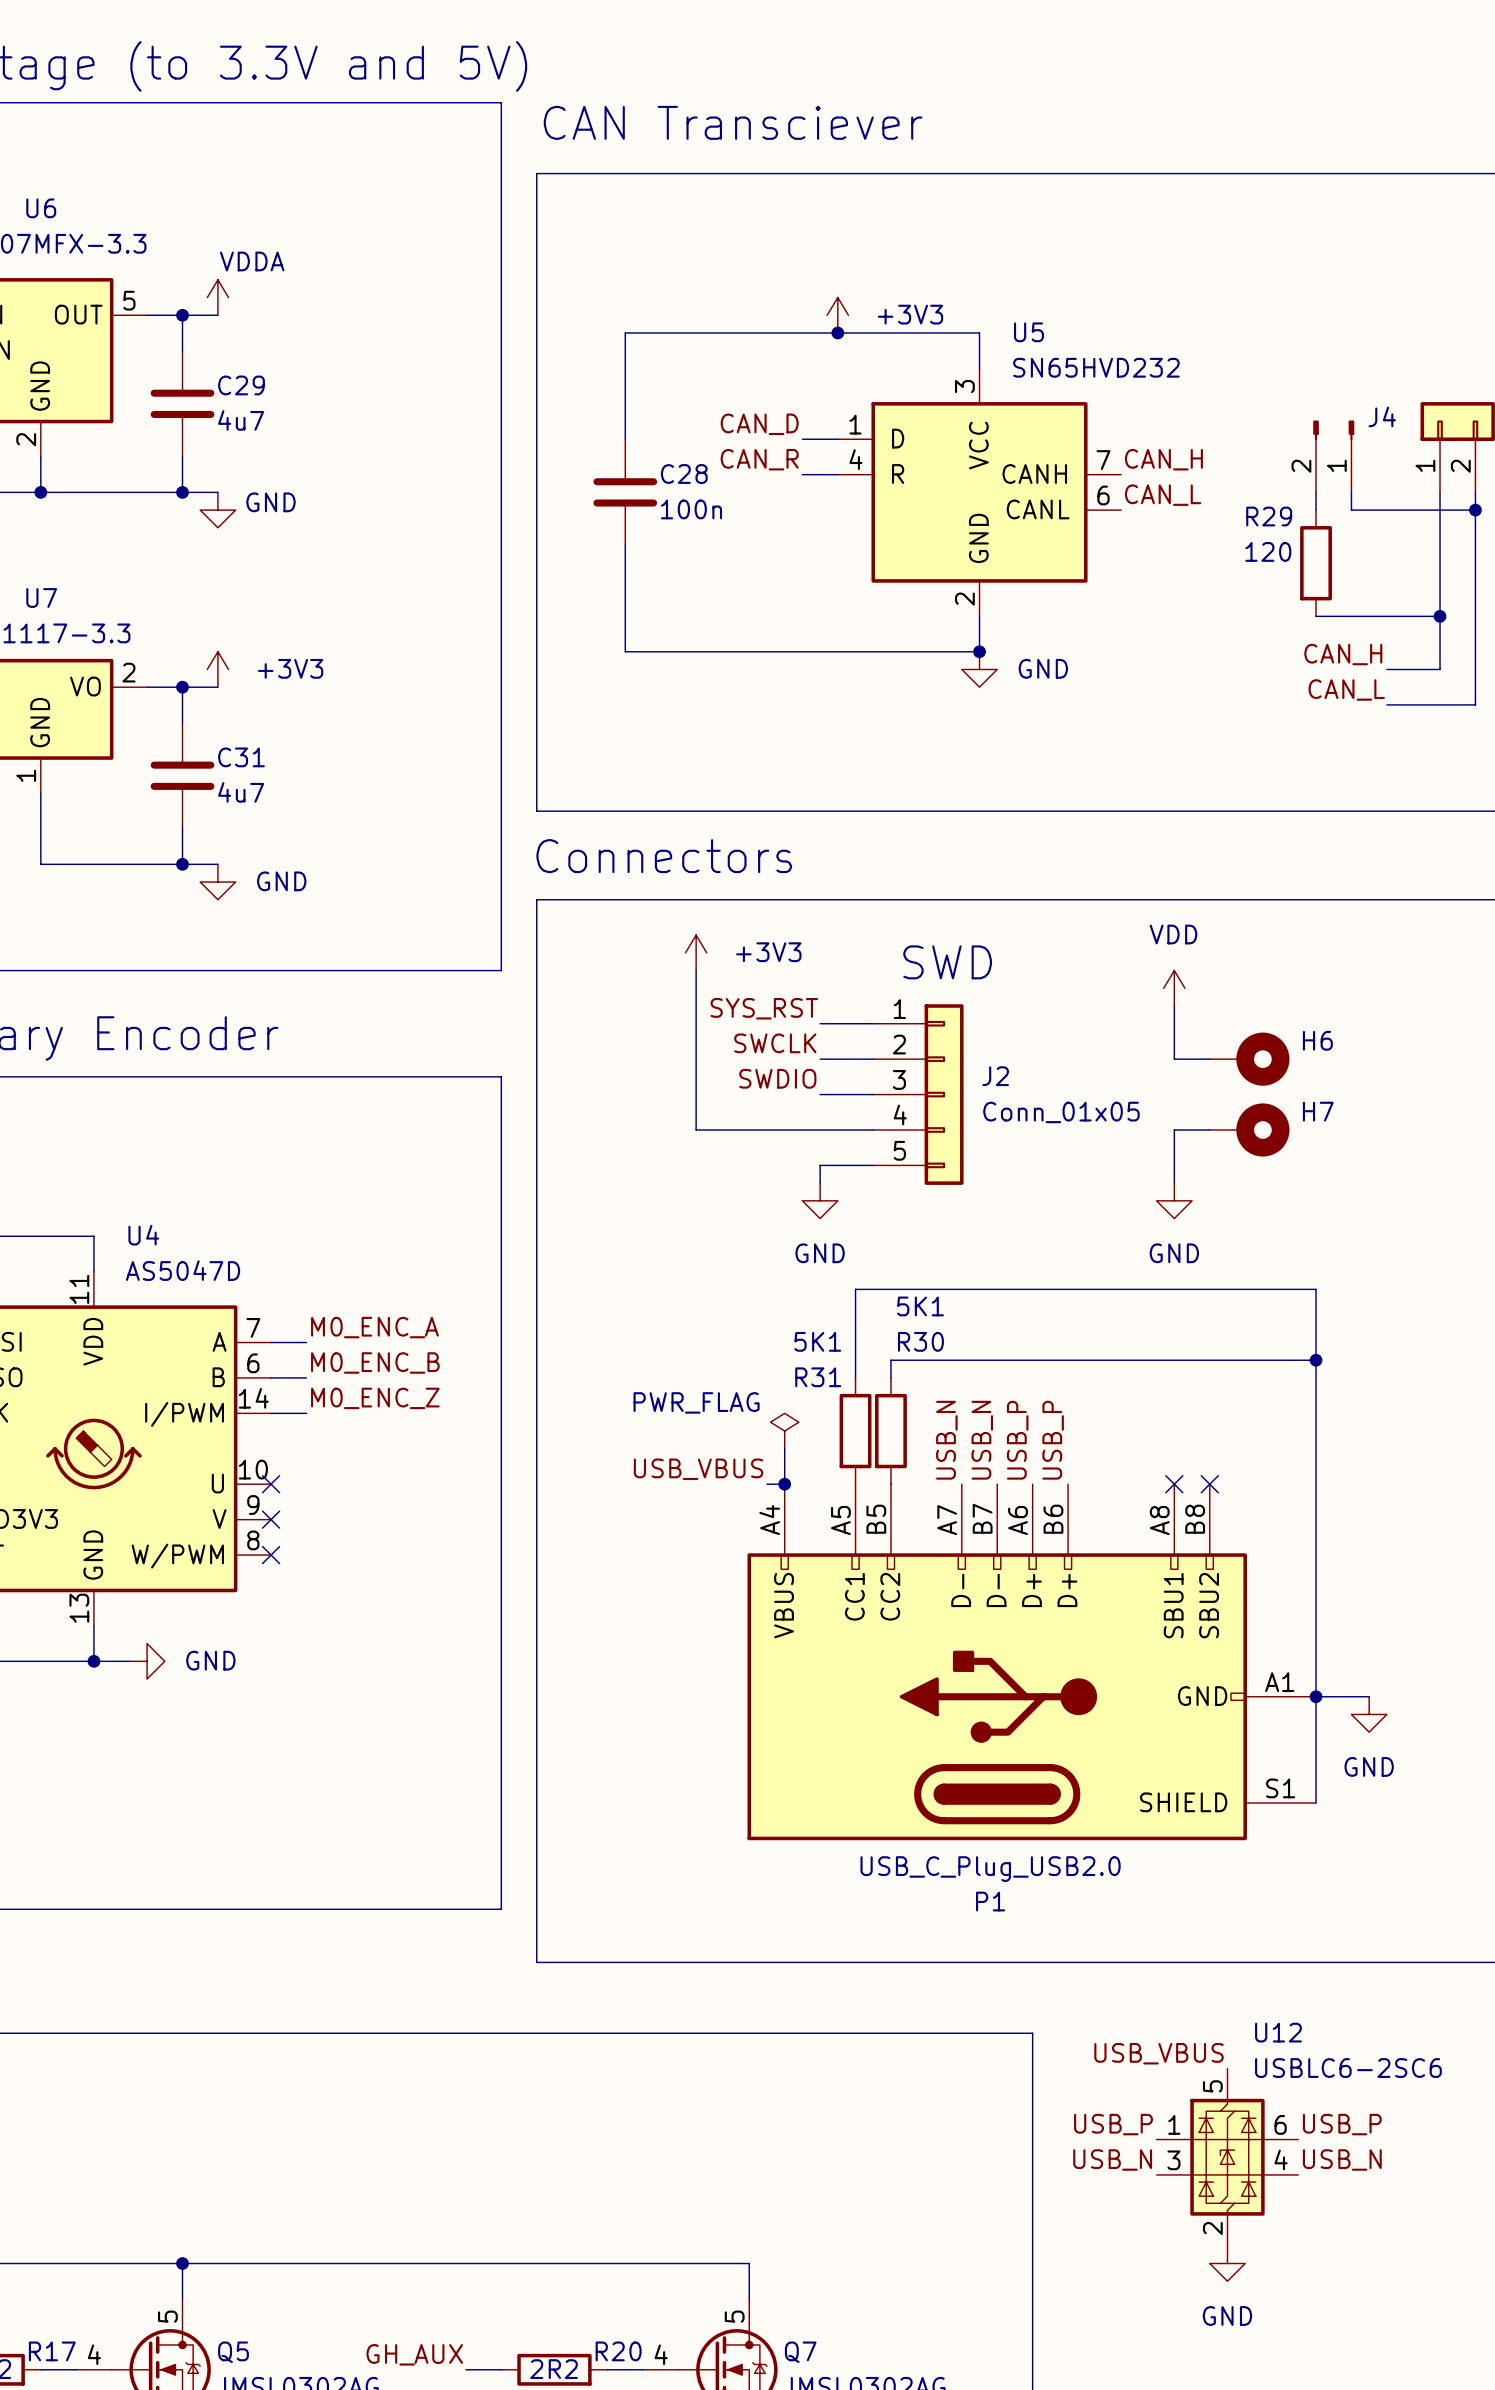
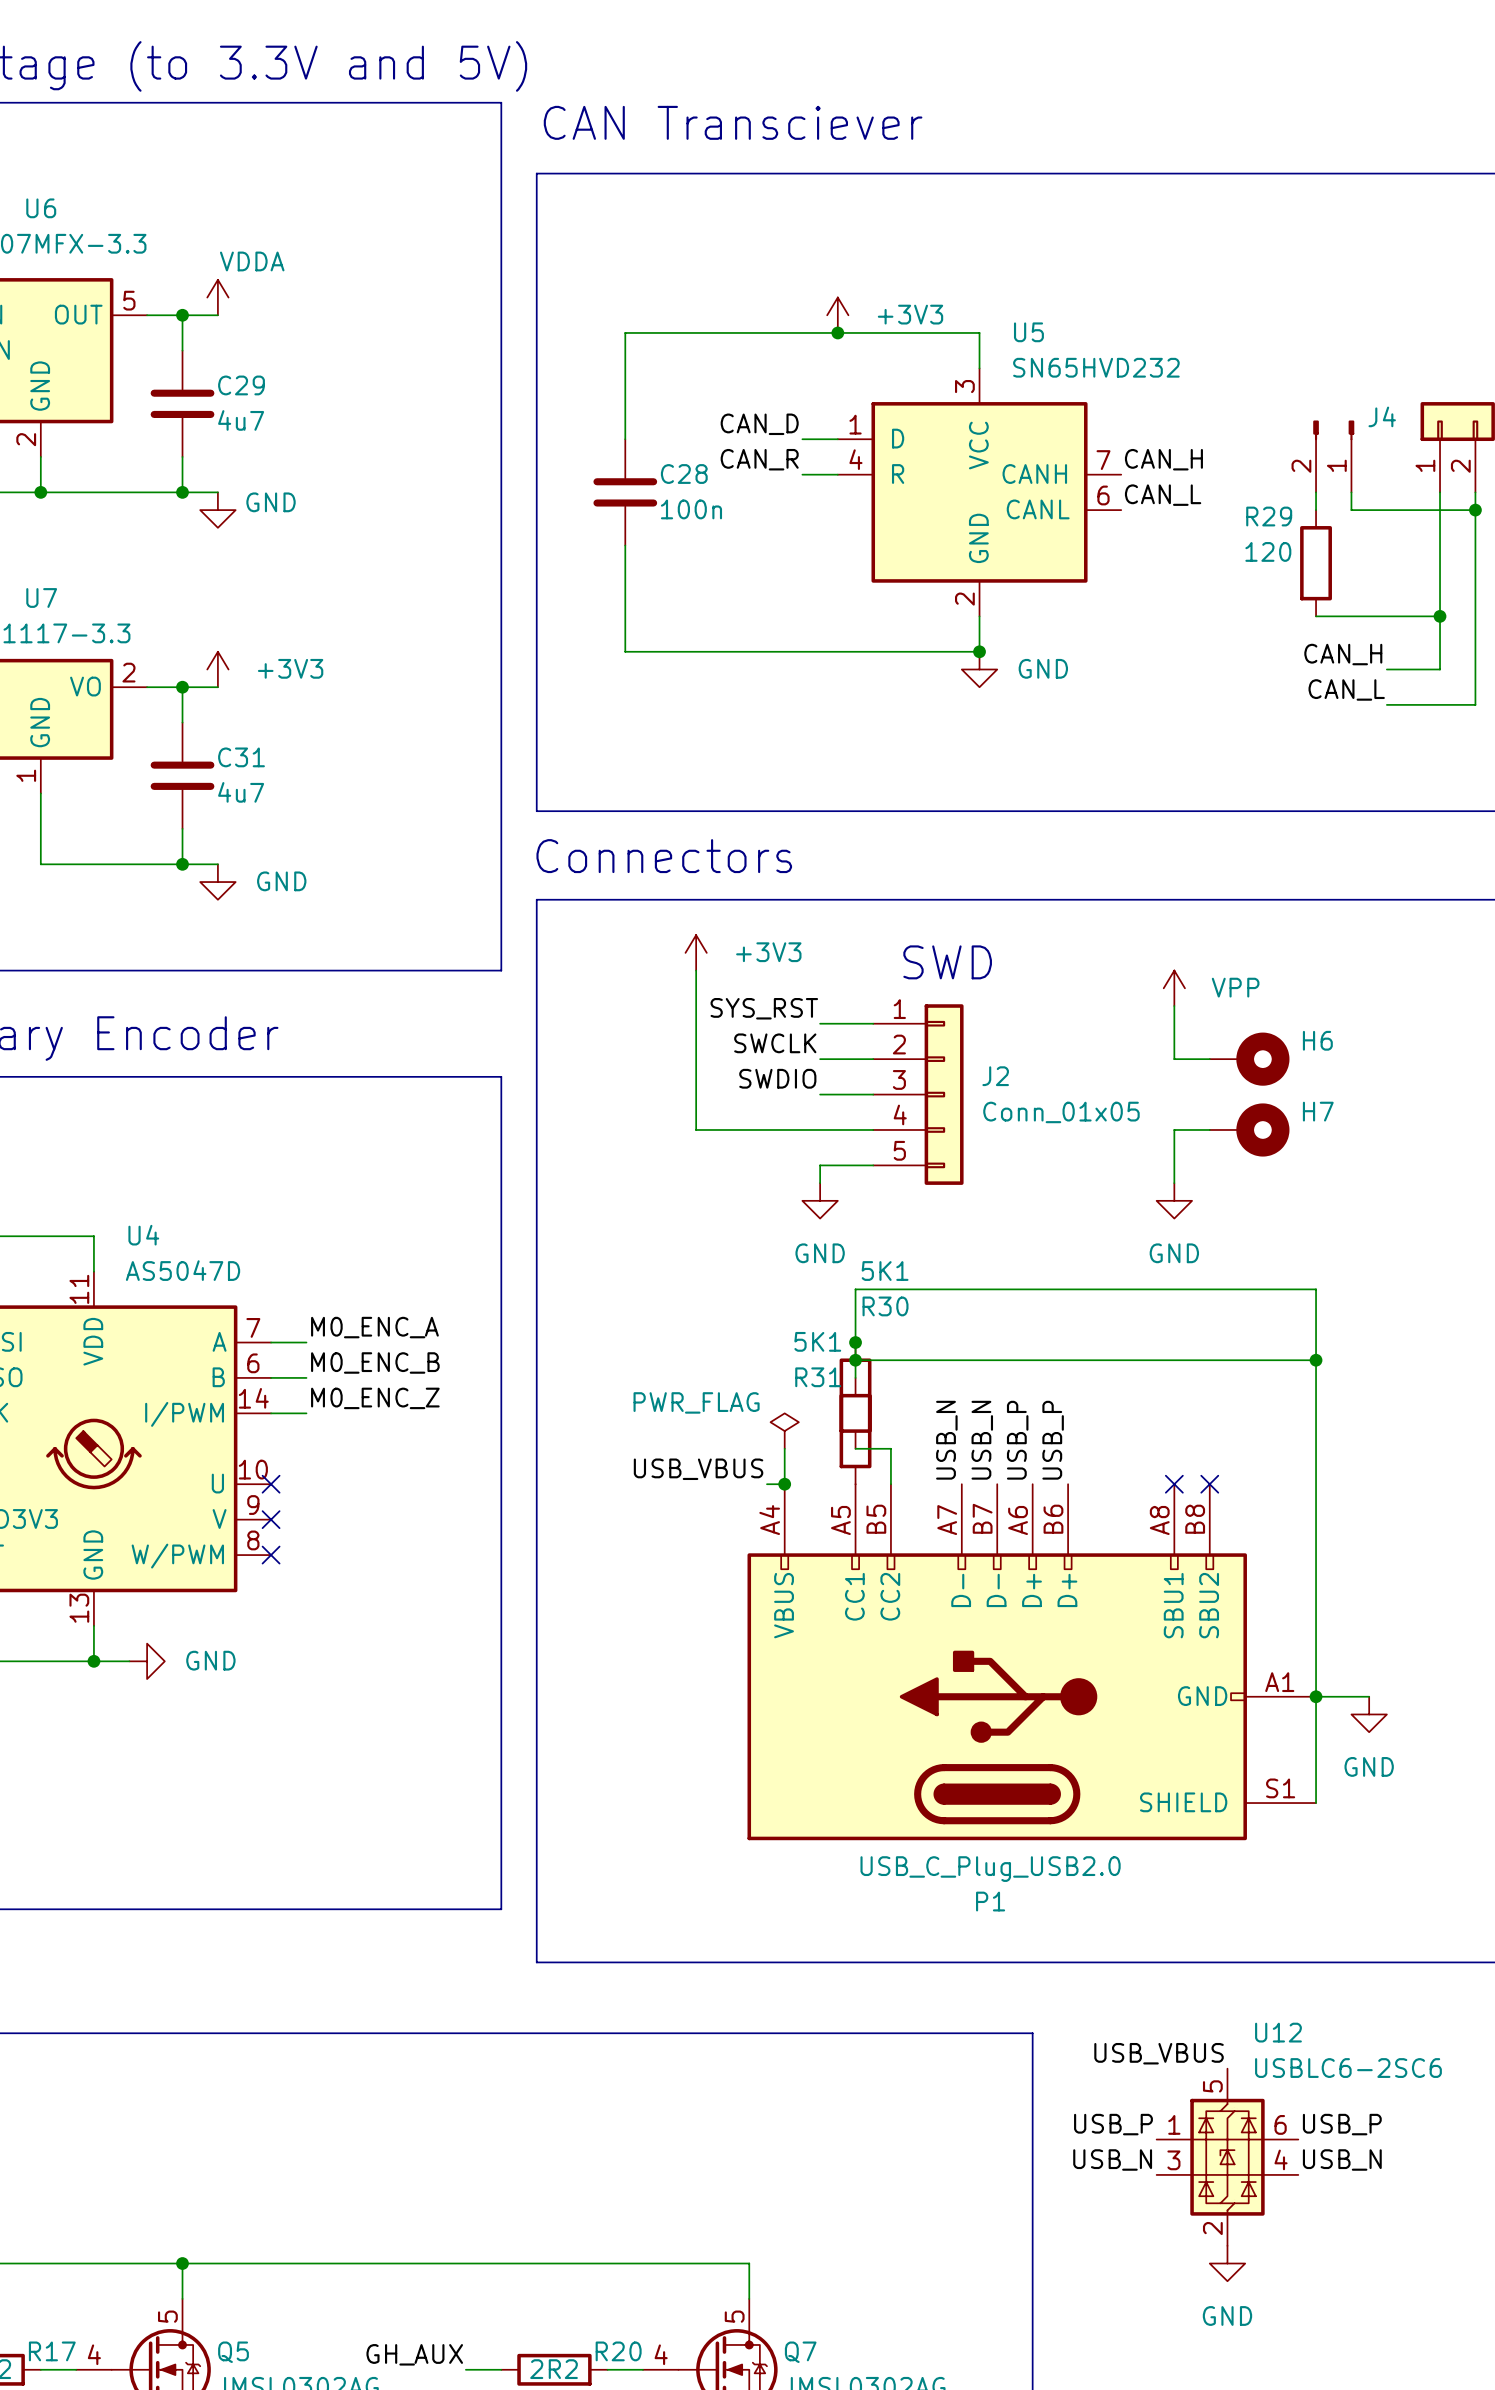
power symbol: VDD (1174, 988) -> VPP (1174, 988)
junction: none -> (855, 1342)
junction: none -> (855, 1360)
wire: (890, 1360) (890, 1377) -> (890, 1360) (855, 1360)
R30 position: (890, 1431) -> (855, 1395)
wire: none -> (855, 1448) (890, 1448) (890, 1484)

